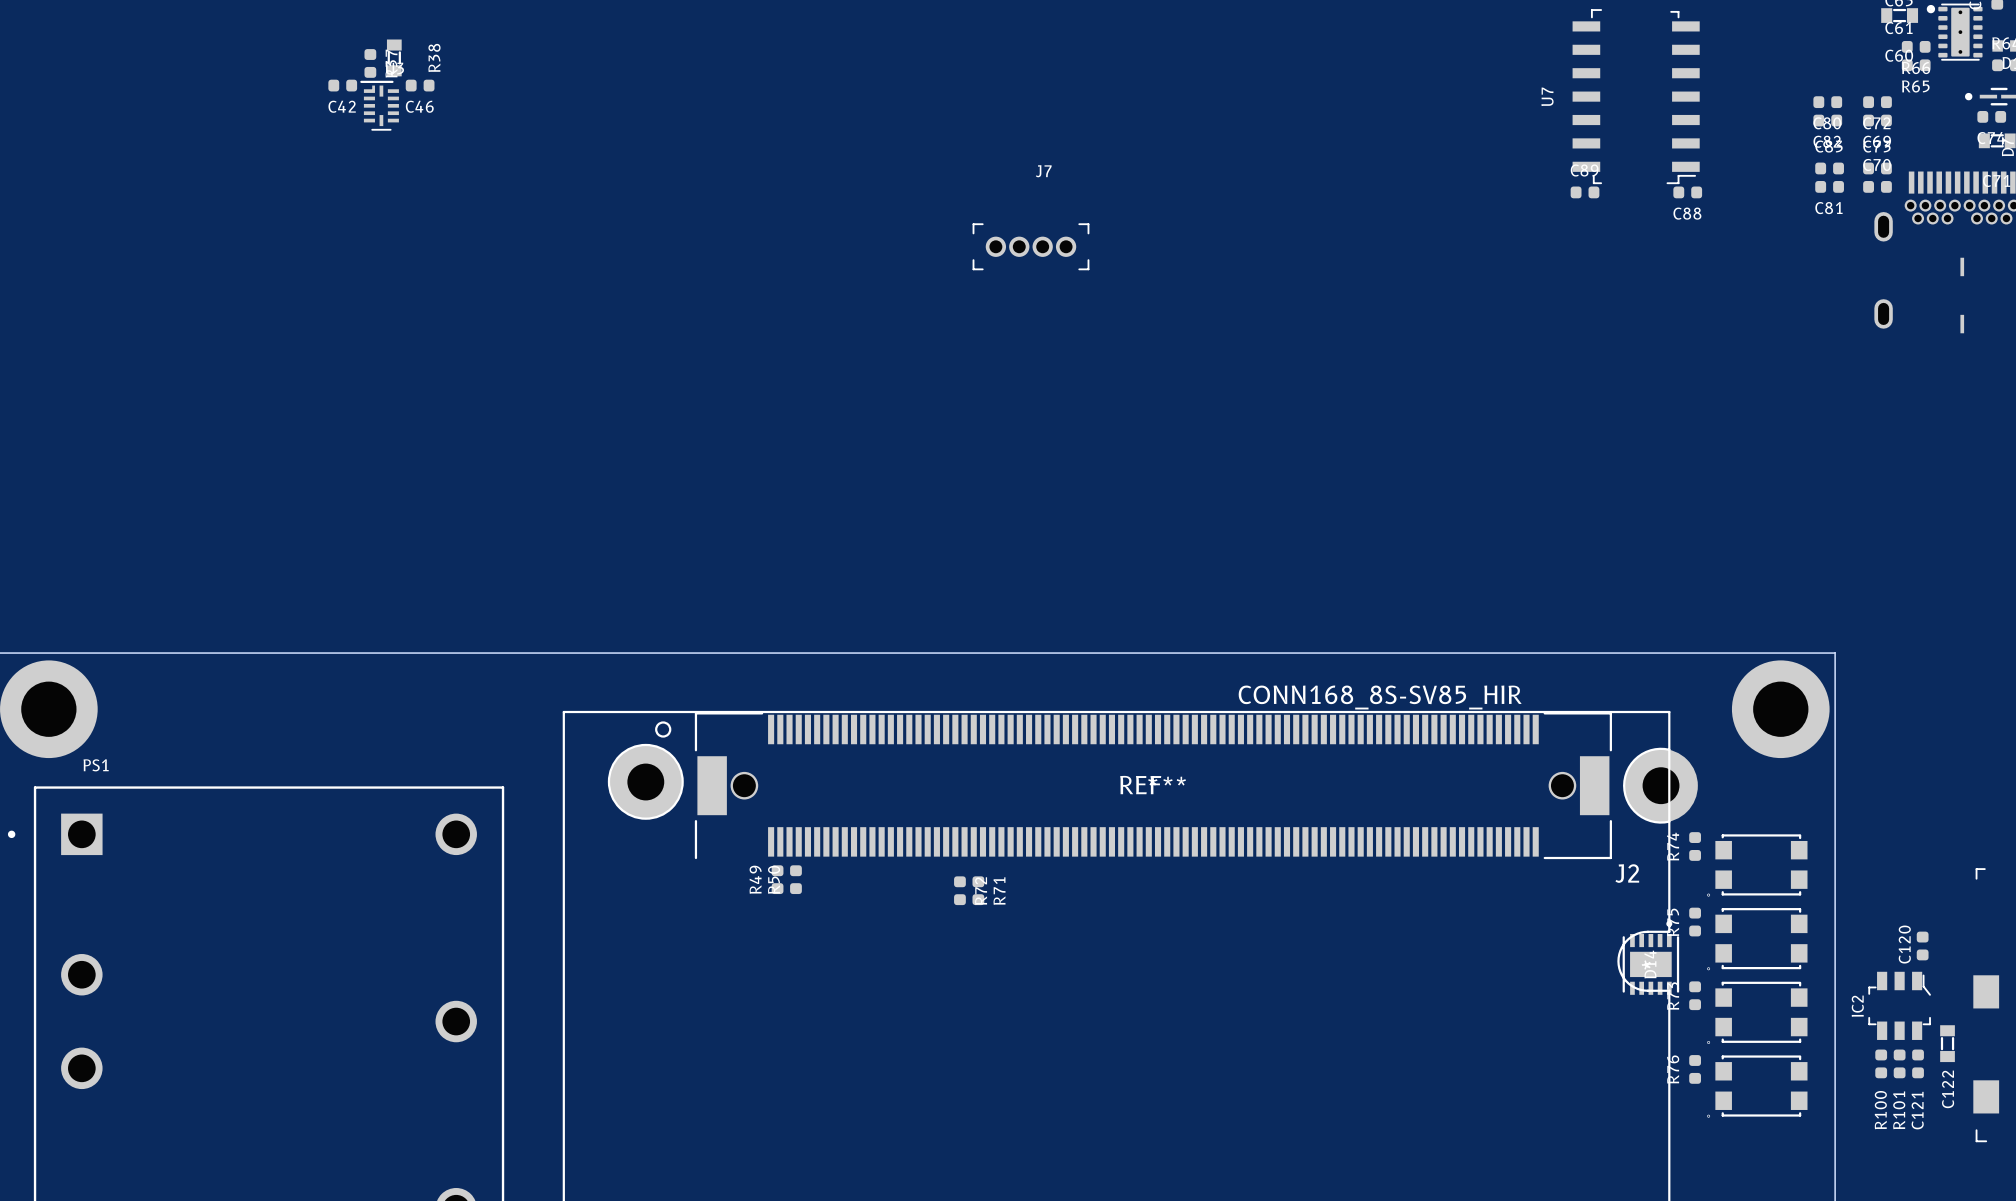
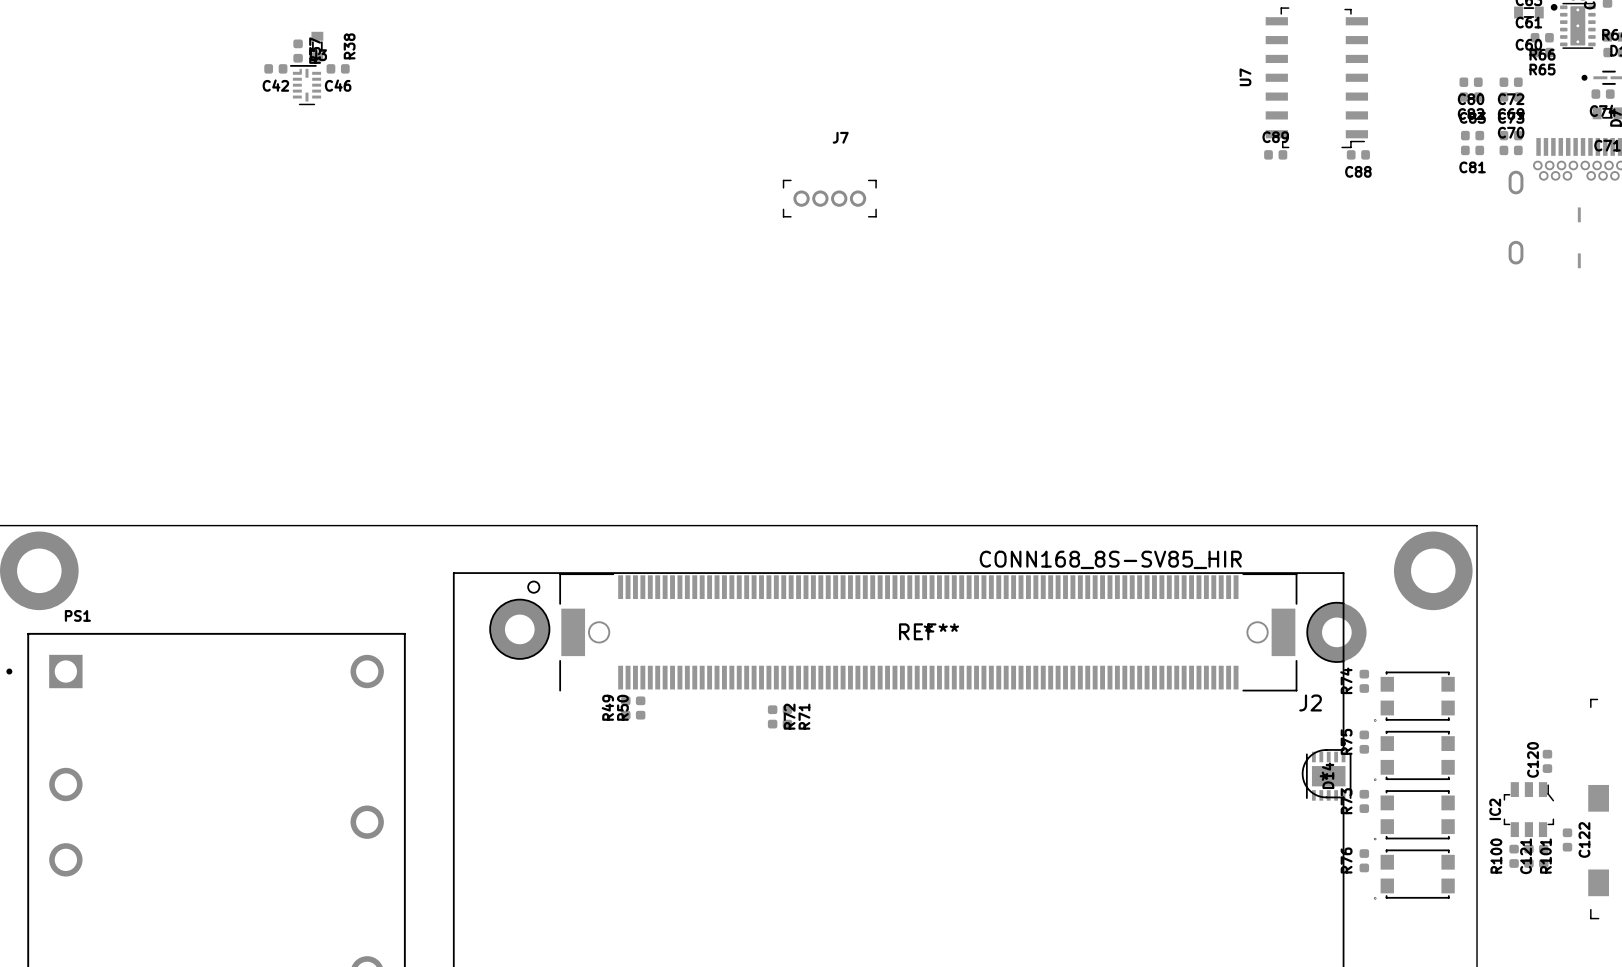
C122 footprint: [1940, 1025, 1955, 1063] -> [1562, 828, 1573, 852]
C122 name position: C122 (1948, 1089) -> C122 (1584, 839)
R100 name position: R100 (1880, 1110) -> R100 (1496, 856)
R101 name position: R101 (1899, 1110) -> R101 (1545, 856)
C121 name position: C121 (1917, 1110) -> C121 (1526, 856)

